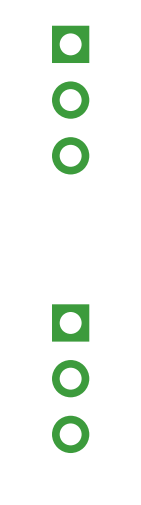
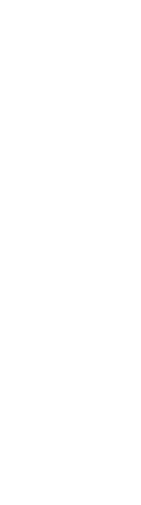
part: (70, 100) -> none
part: (70, 378) -> none

